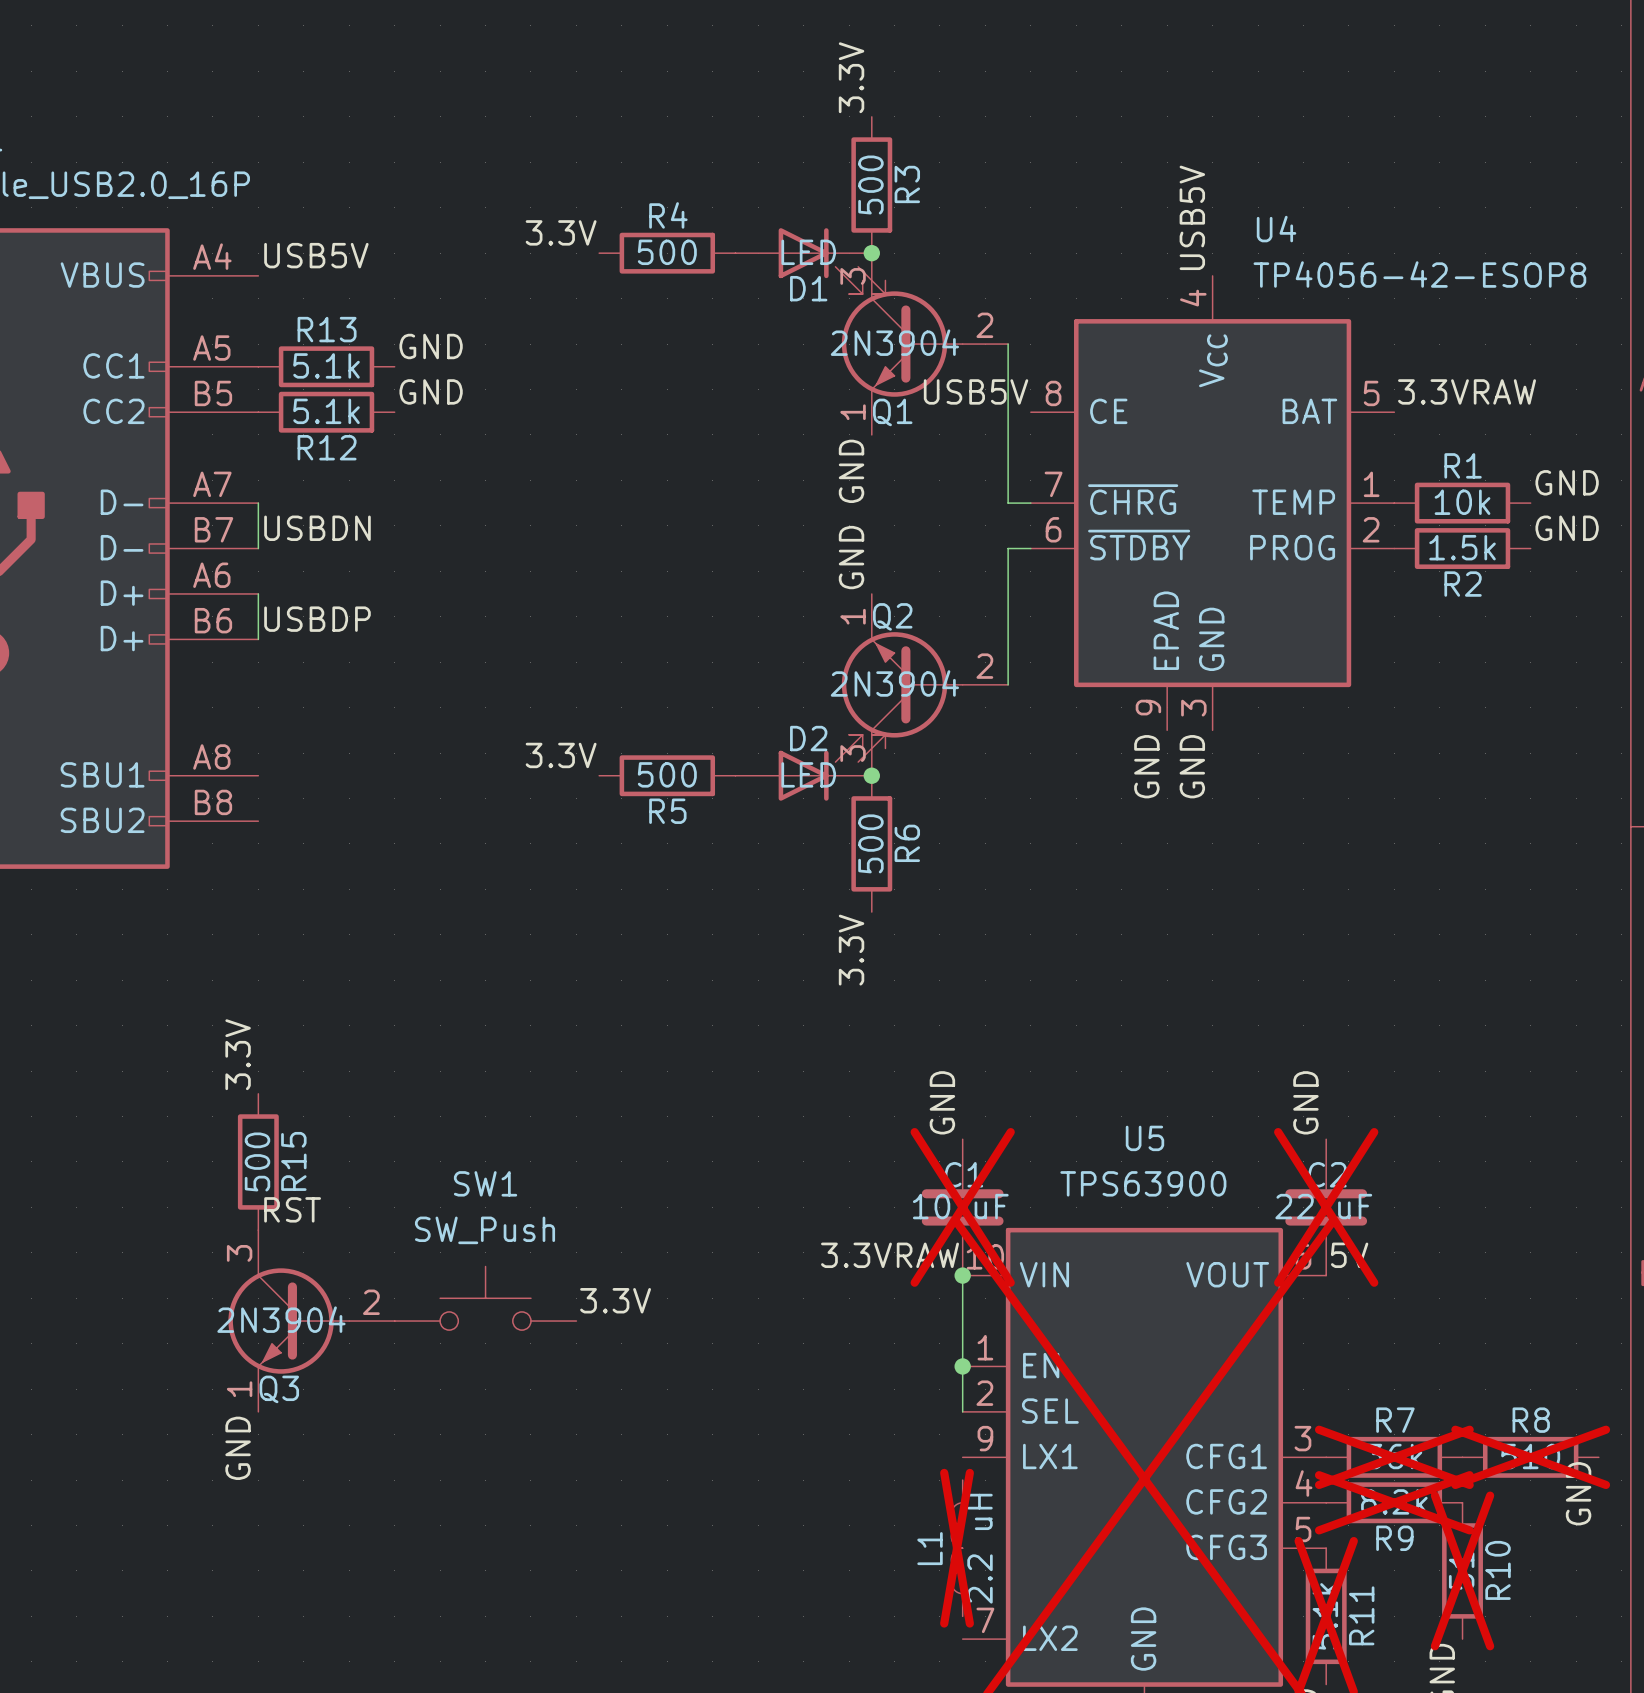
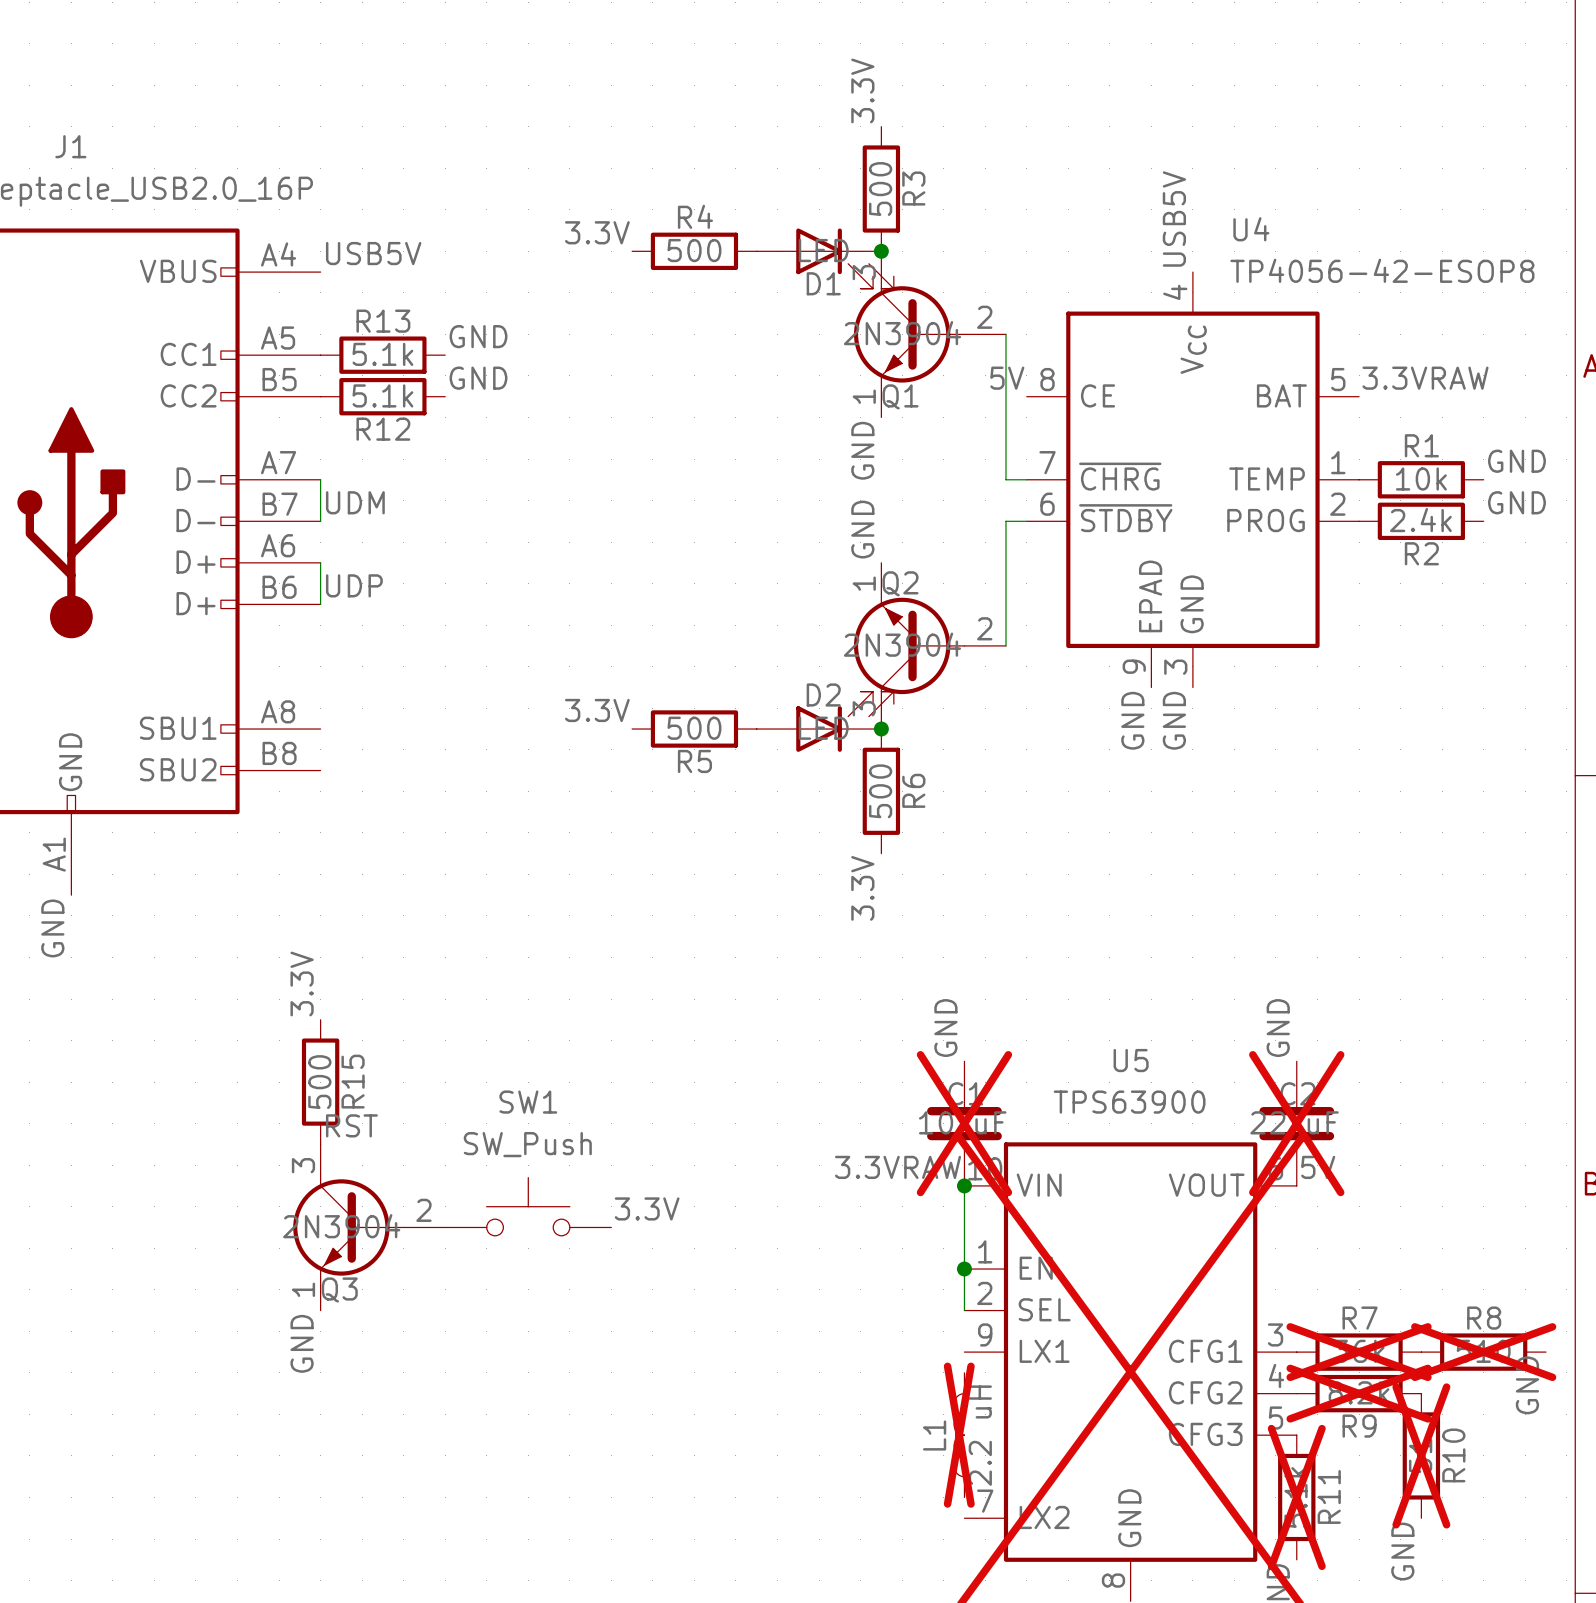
label: USB5V (976, 391) -> 5V (1007, 378)
label: USBDN (317, 528) -> UDM (355, 502)
R2 value: 1.5k (1462, 547) -> 2.4k (1420, 520)
label: USBDP (317, 619) -> UDP (354, 585)

